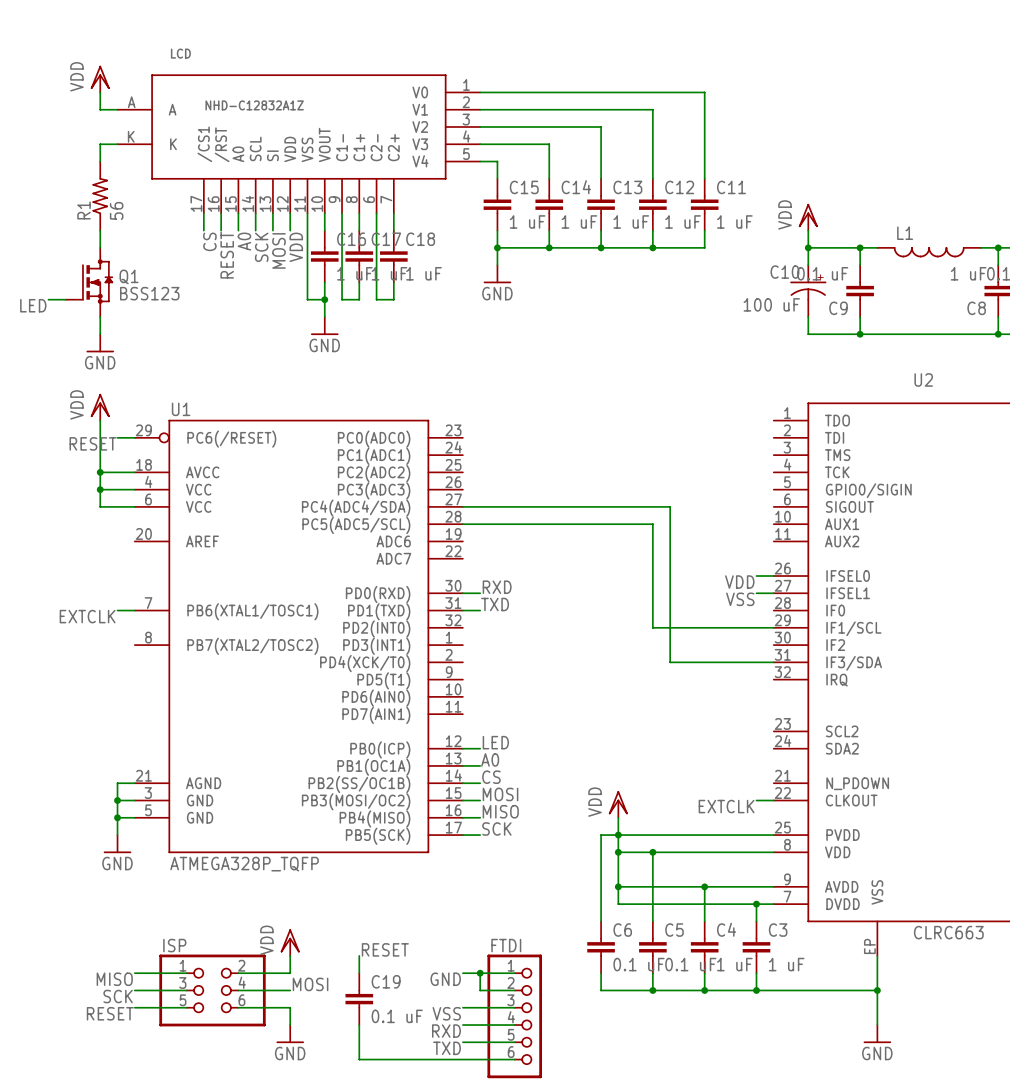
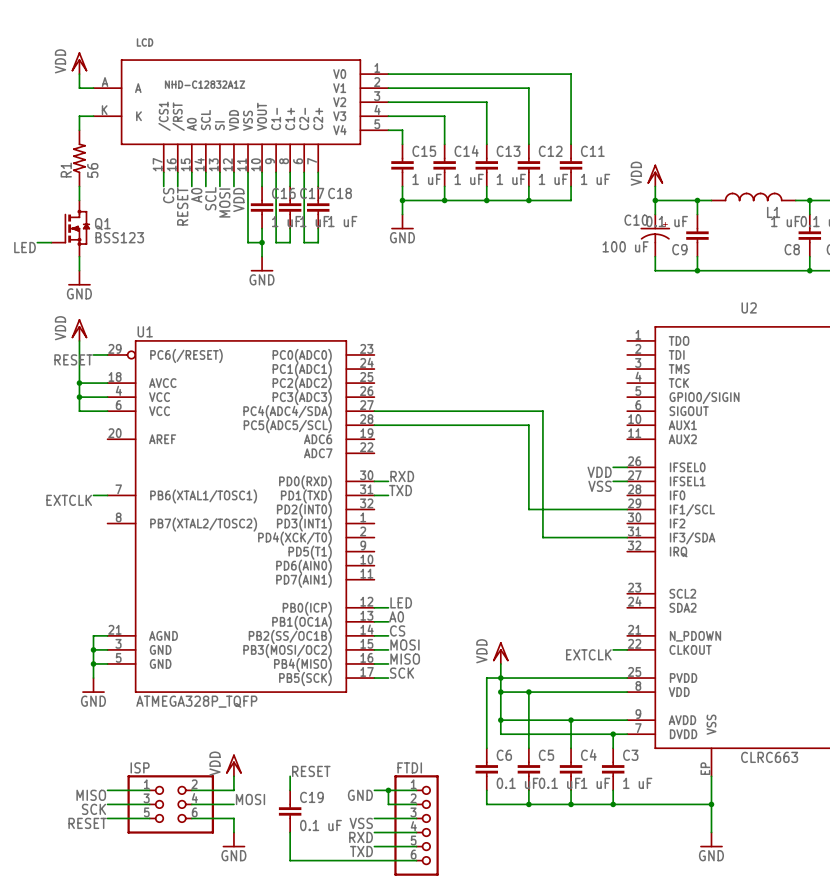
label: SCK (261, 247) -> SCL (210, 198)
L1 rotation: 0° (929, 252) -> 180° (753, 196)

